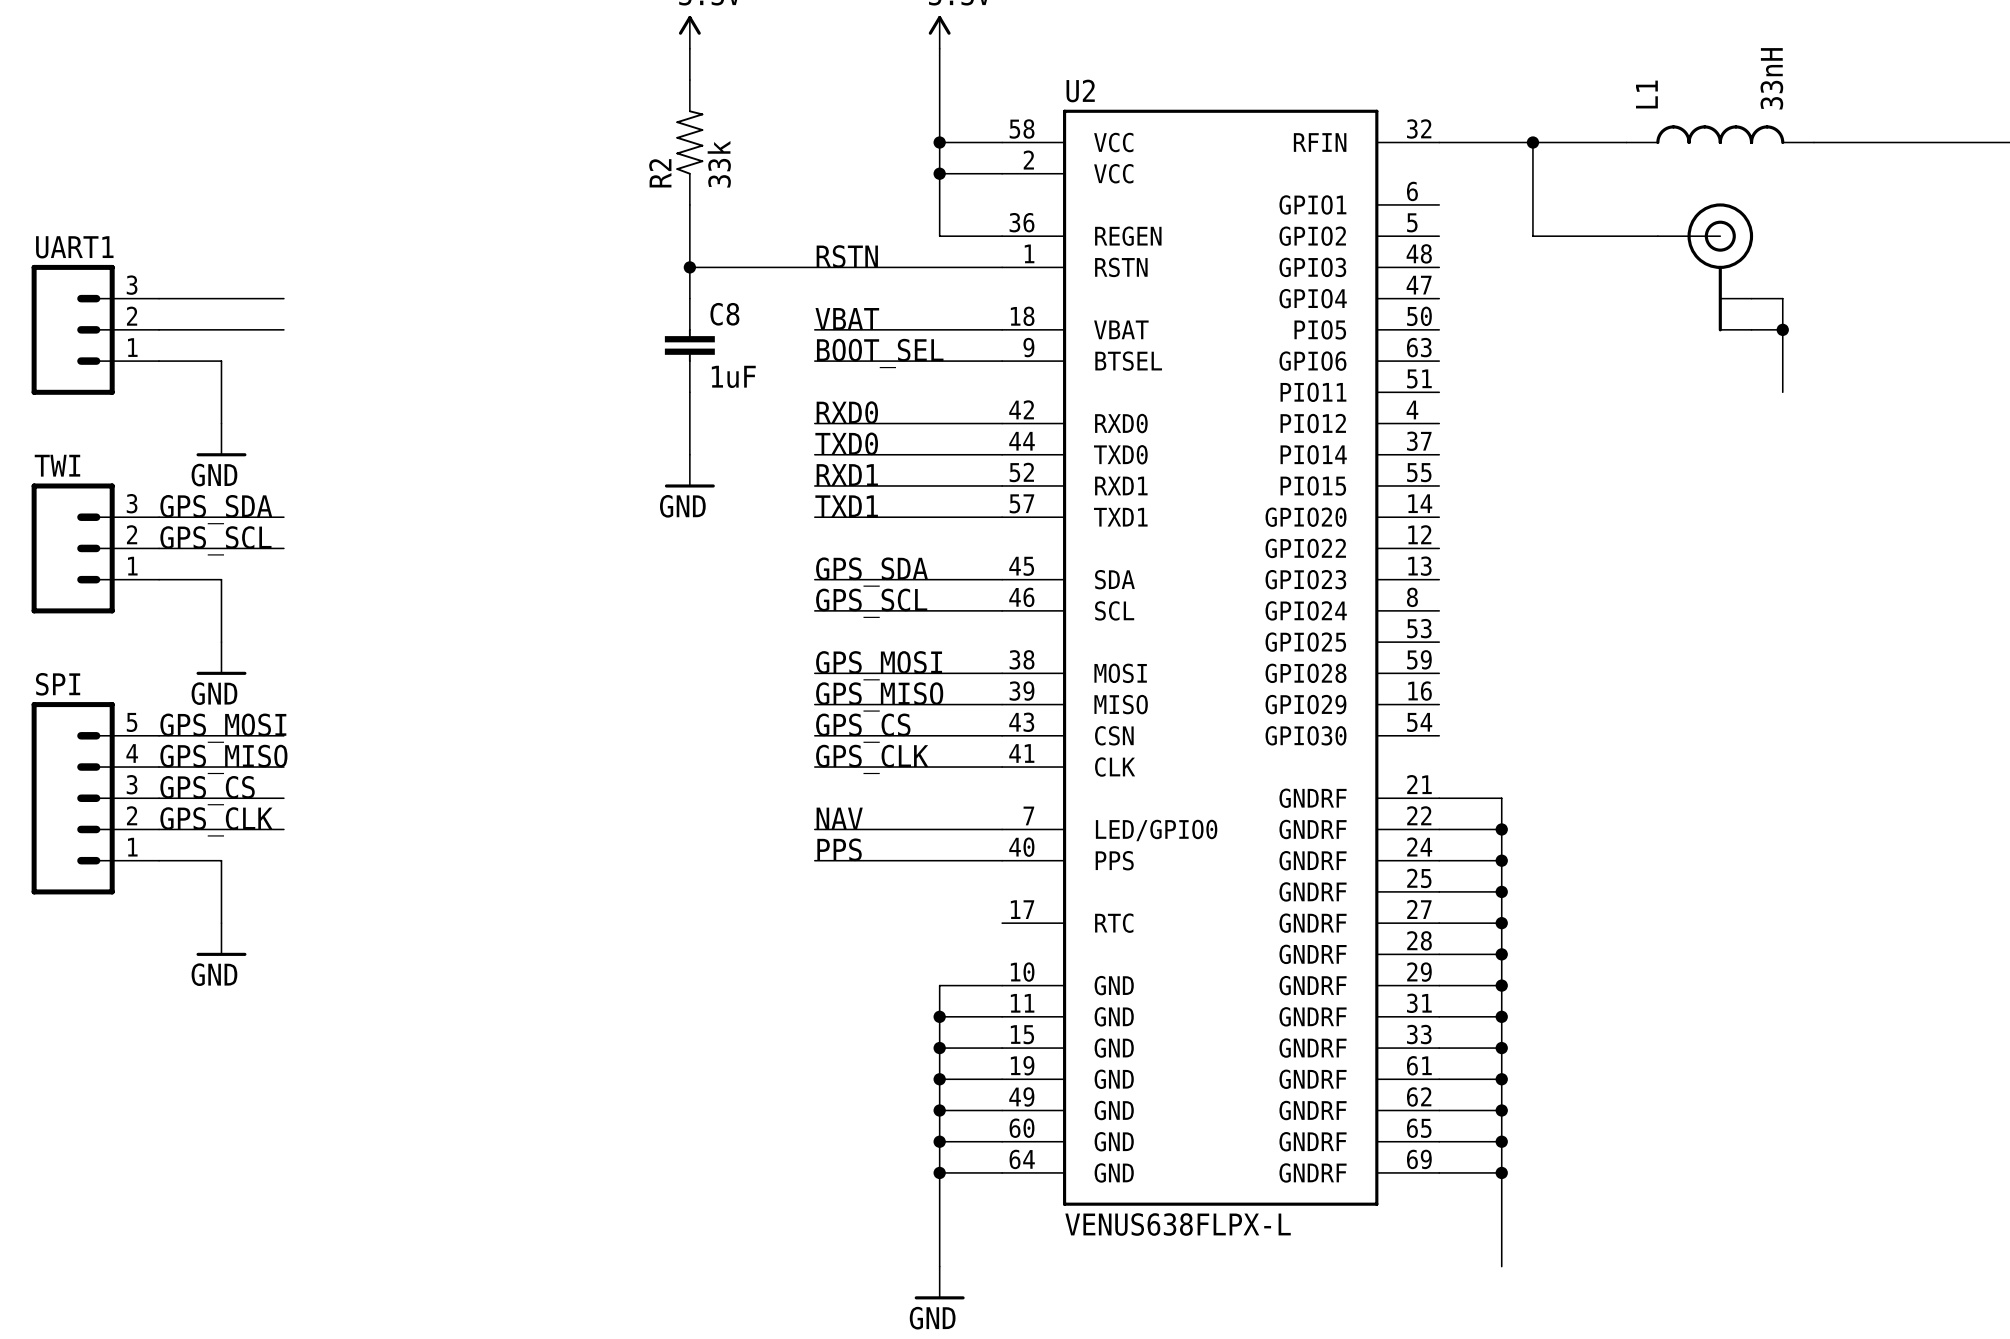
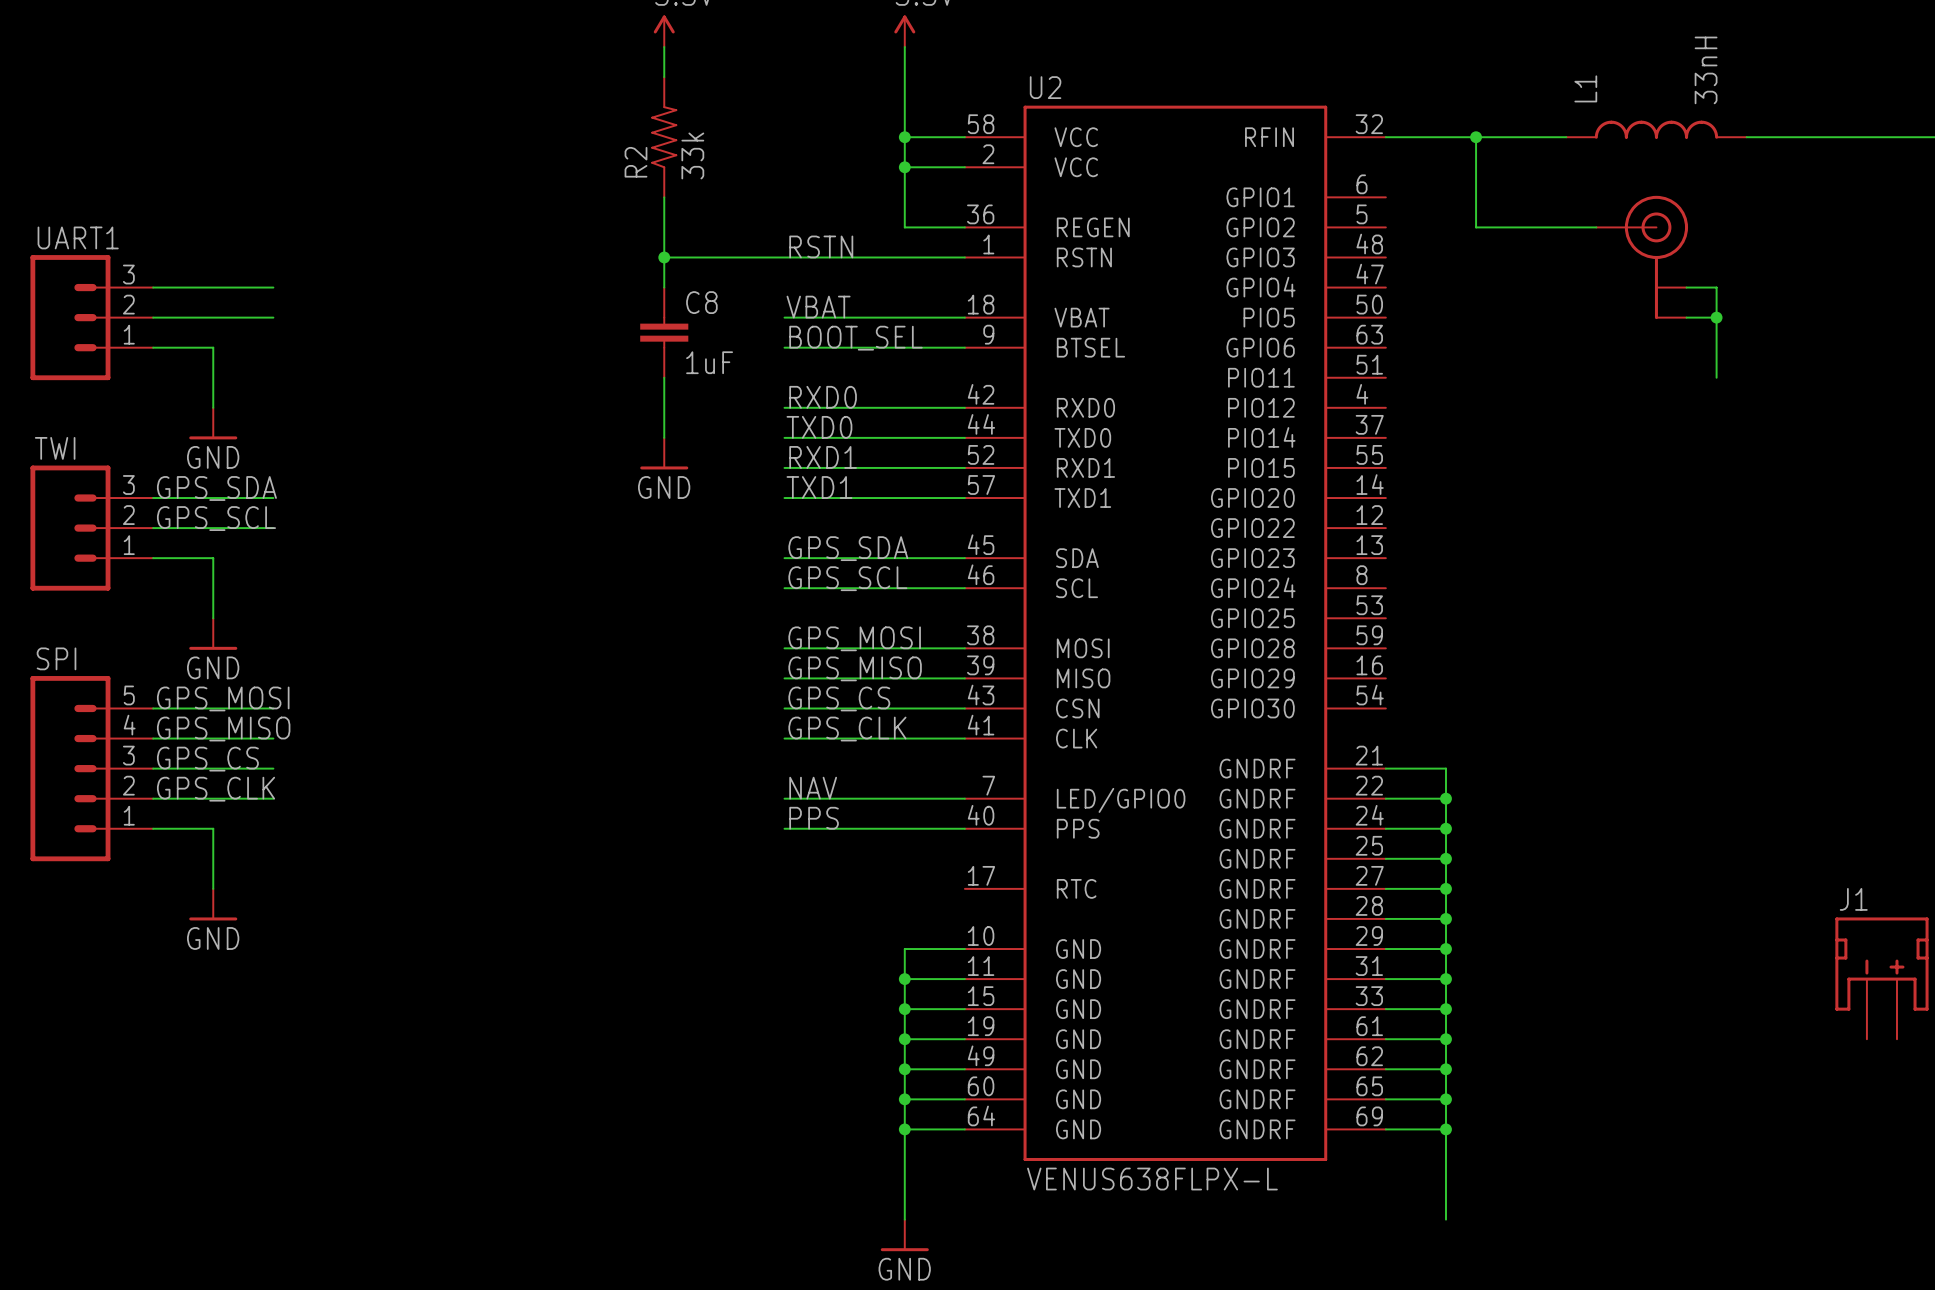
J1: none -> (1881, 978)

